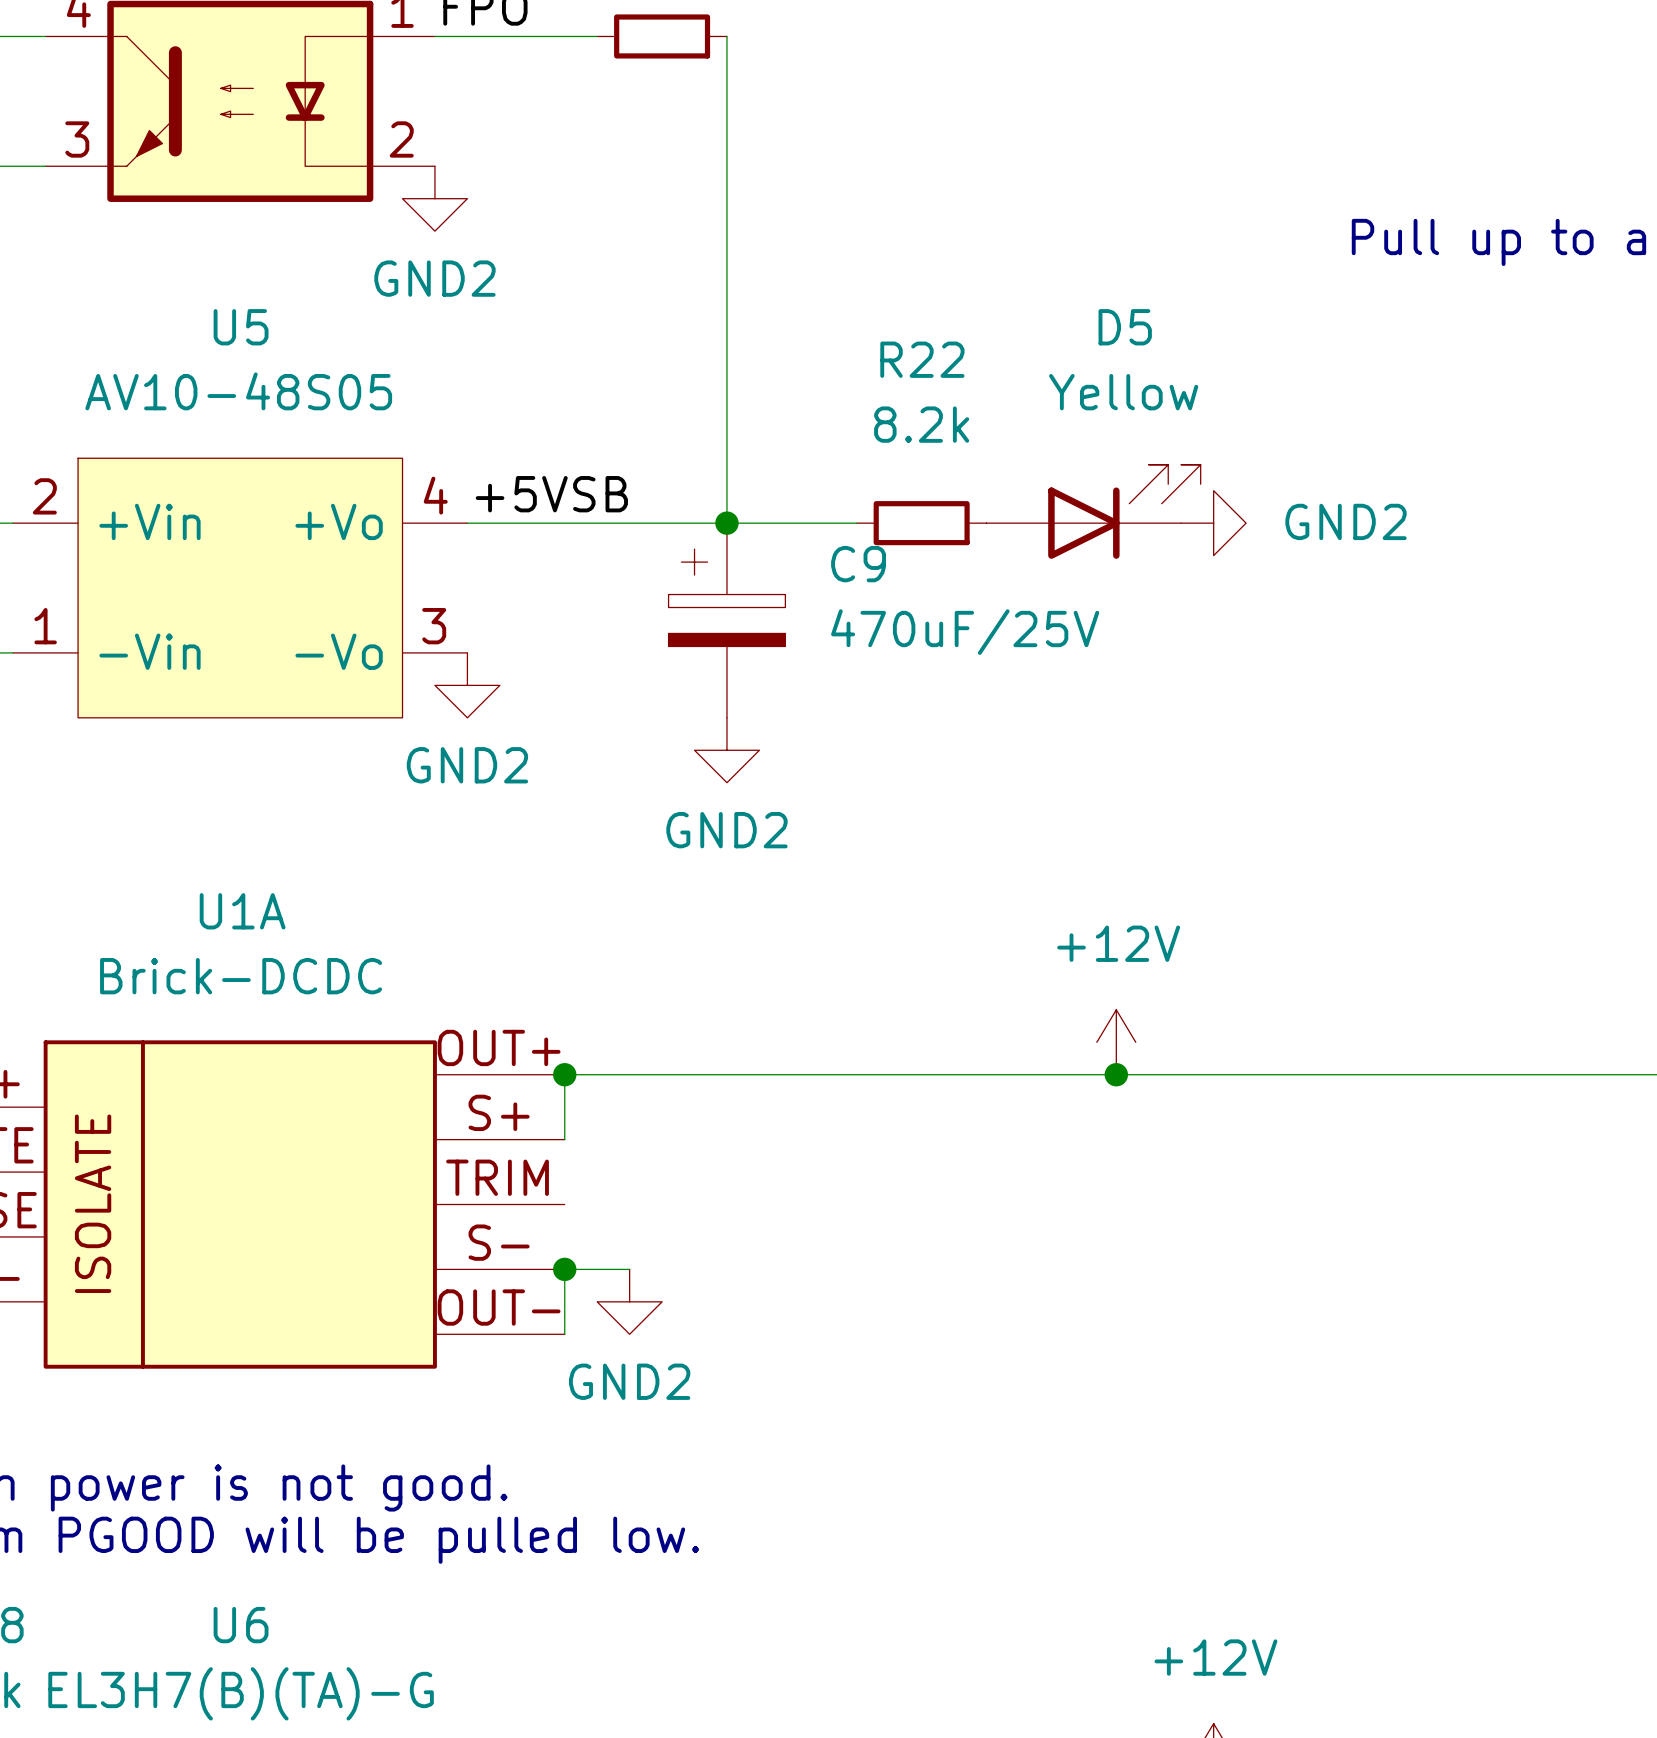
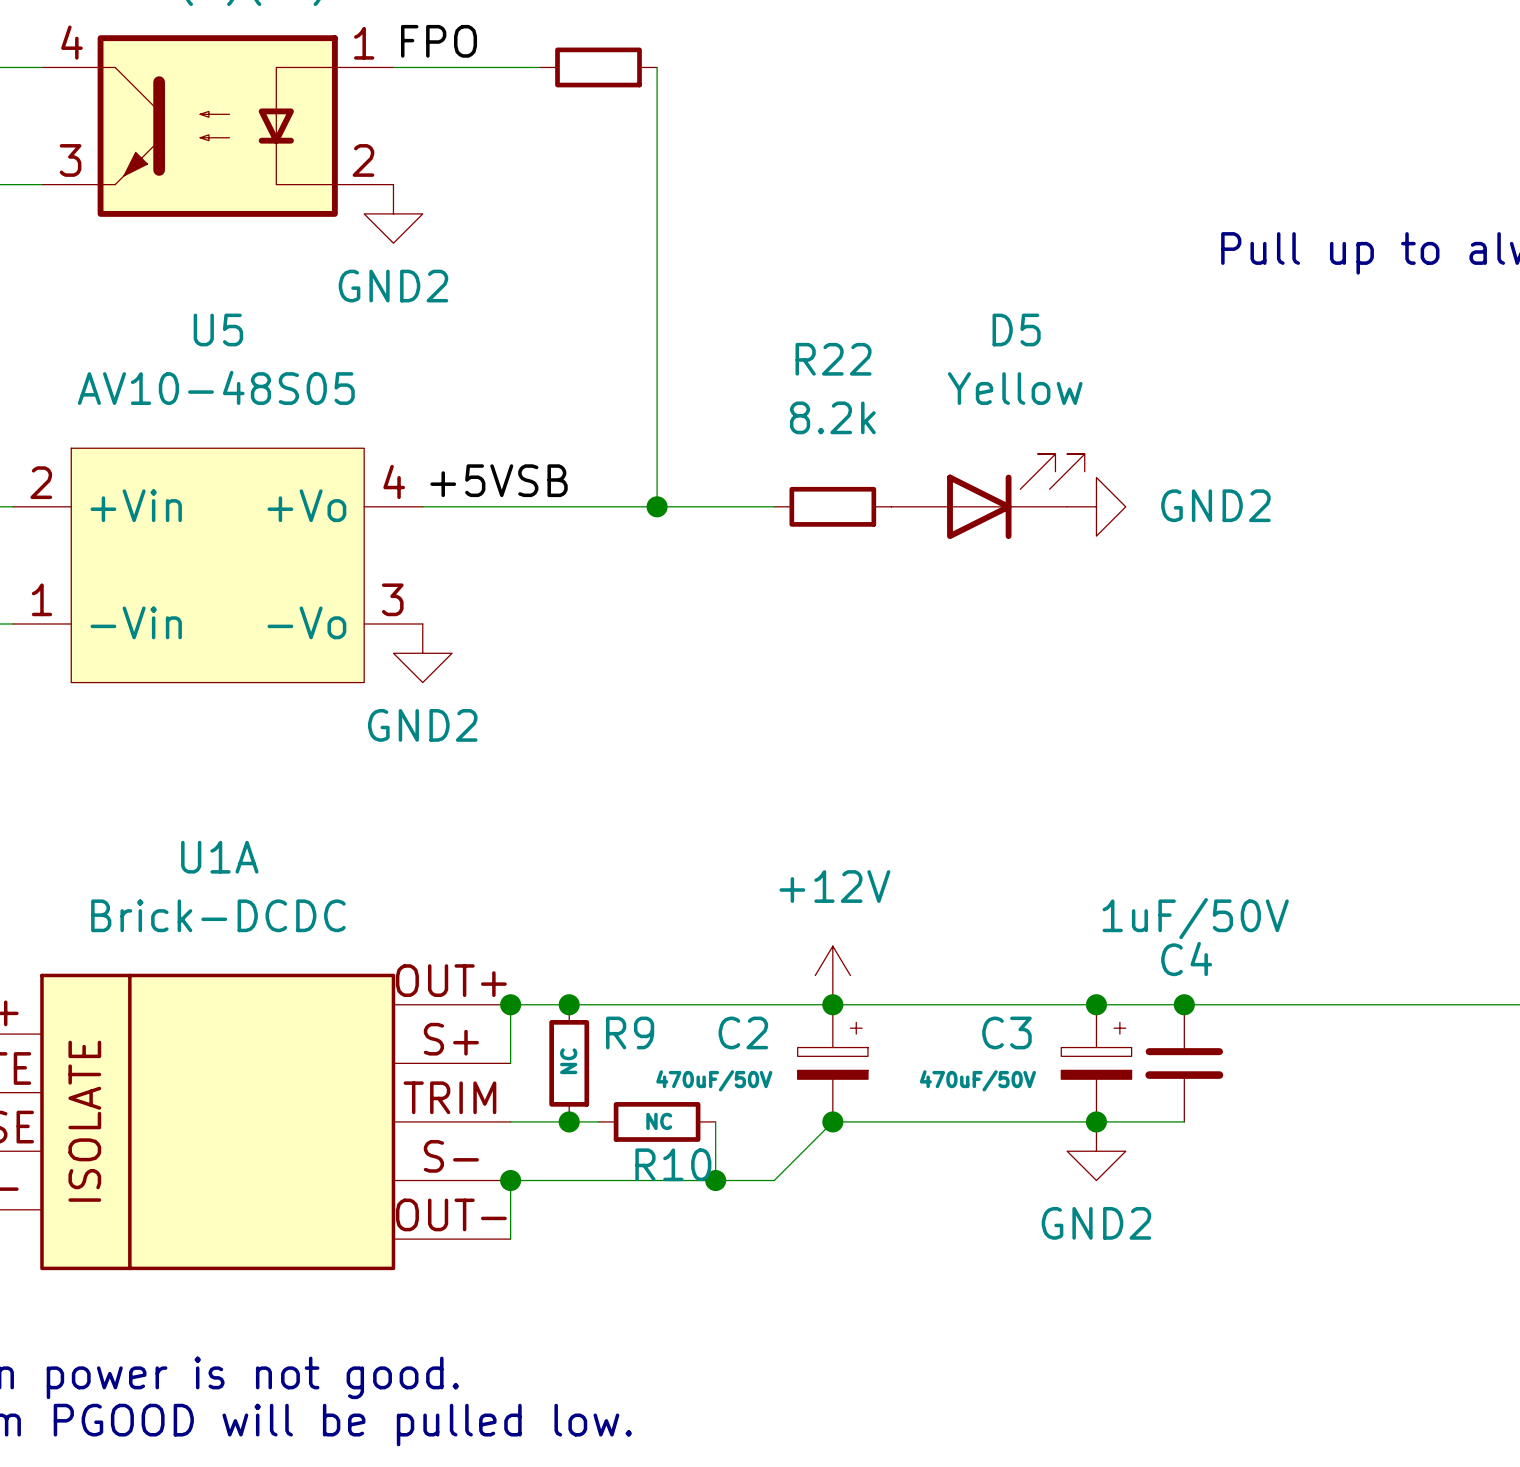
C9: 470uF/25V (726, 620) -> none
power symbol: GND2 (726, 750) -> none
power symbol position: +12V (1116, 1042) -> +12V (832, 975)
junction: none -> (569, 1004)
junction: none -> (832, 1004)
junction: (1116, 1074) -> none
junction: none -> (1096, 1004)
junction: none -> (1184, 1004)
R9: none -> NC (569, 1063)
C2: none -> 470uF/50V (832, 1063)
C3: none -> 470uF/50V (1096, 1063)
C4: none -> 1uF/50V (1184, 1063)
wire: none -> (510, 1121) (598, 1121)
junction: none -> (569, 1121)
R10: none -> NC (657, 1121)
wire: none -> (715, 1121) (715, 1180)
junction: none -> (832, 1121)
junction: none -> (1096, 1121)
wire: none -> (1184, 1121) (832, 1121) (774, 1180) (569, 1180)
power symbol: none -> GND2 (1096, 1151)
junction: none -> (715, 1180)
power symbol: GND2 (629, 1301) -> none

